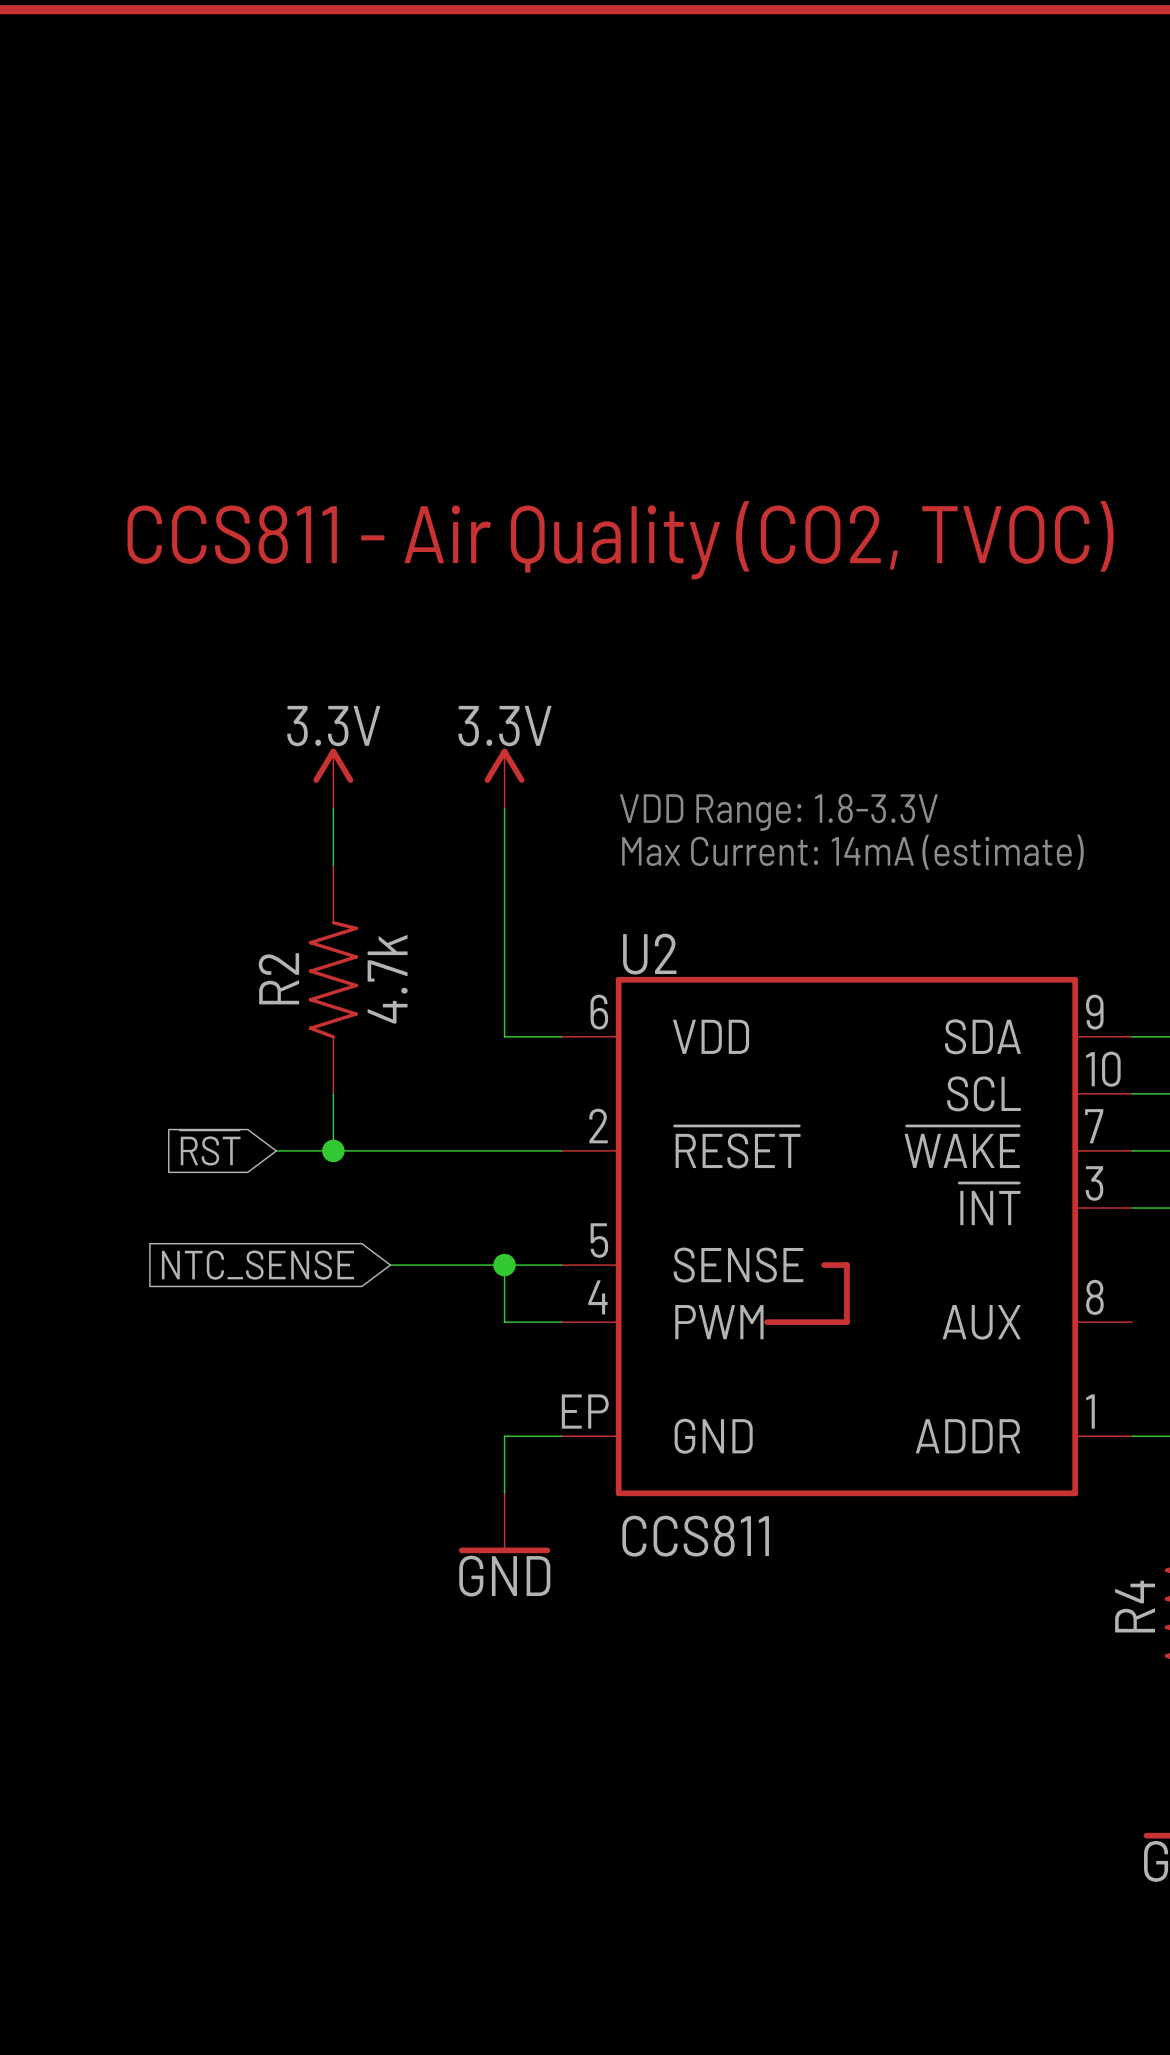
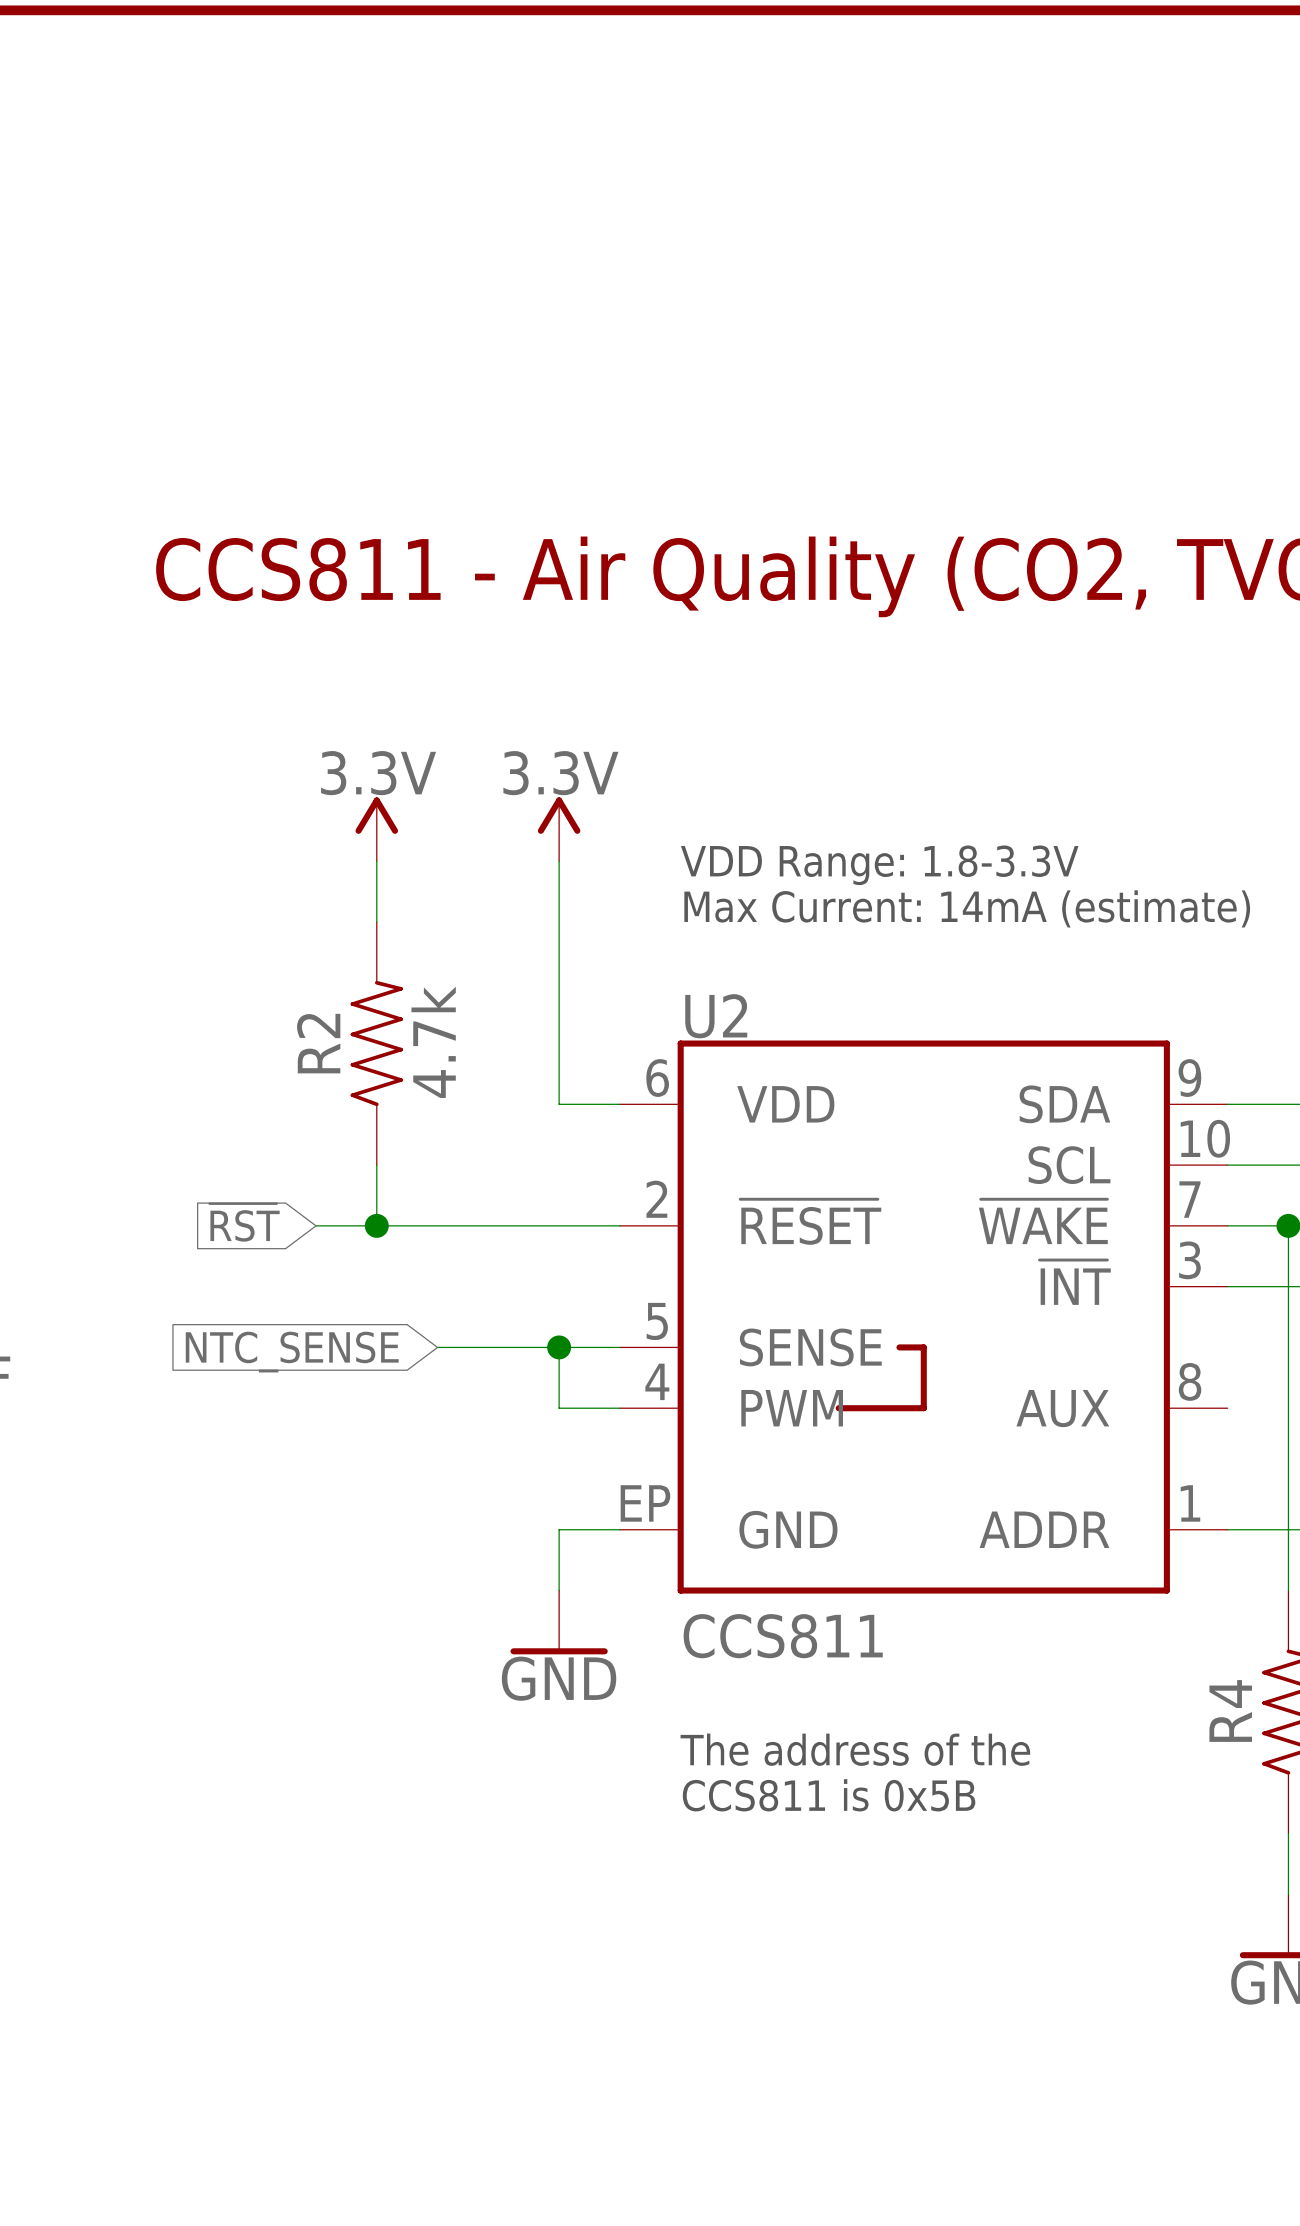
text: none -> The address of the (855, 1749)
text: none -> CCS811 is 0x5B (829, 1795)

